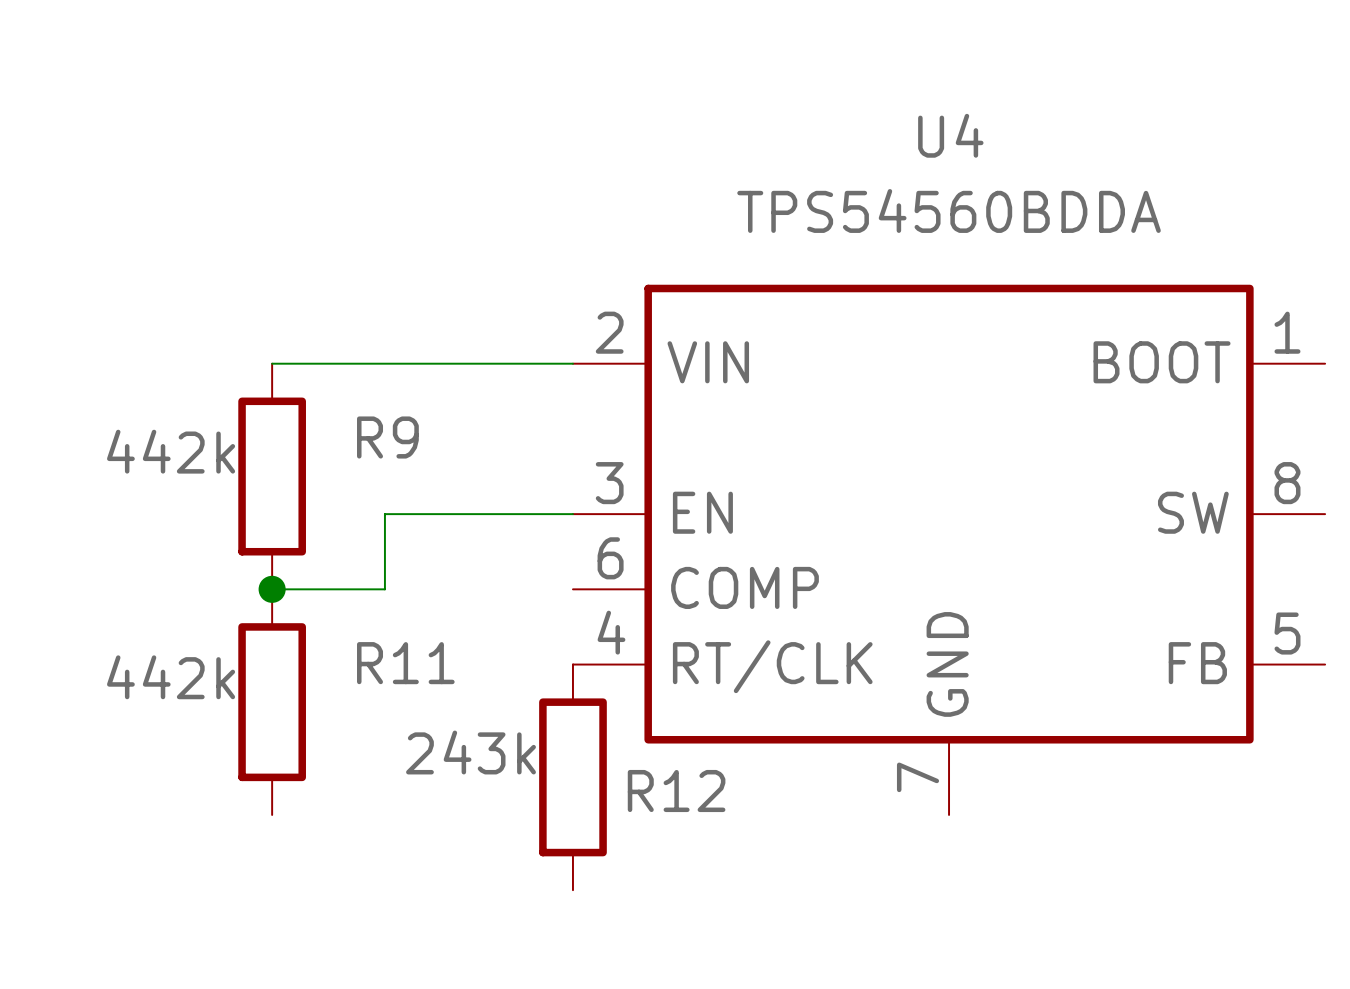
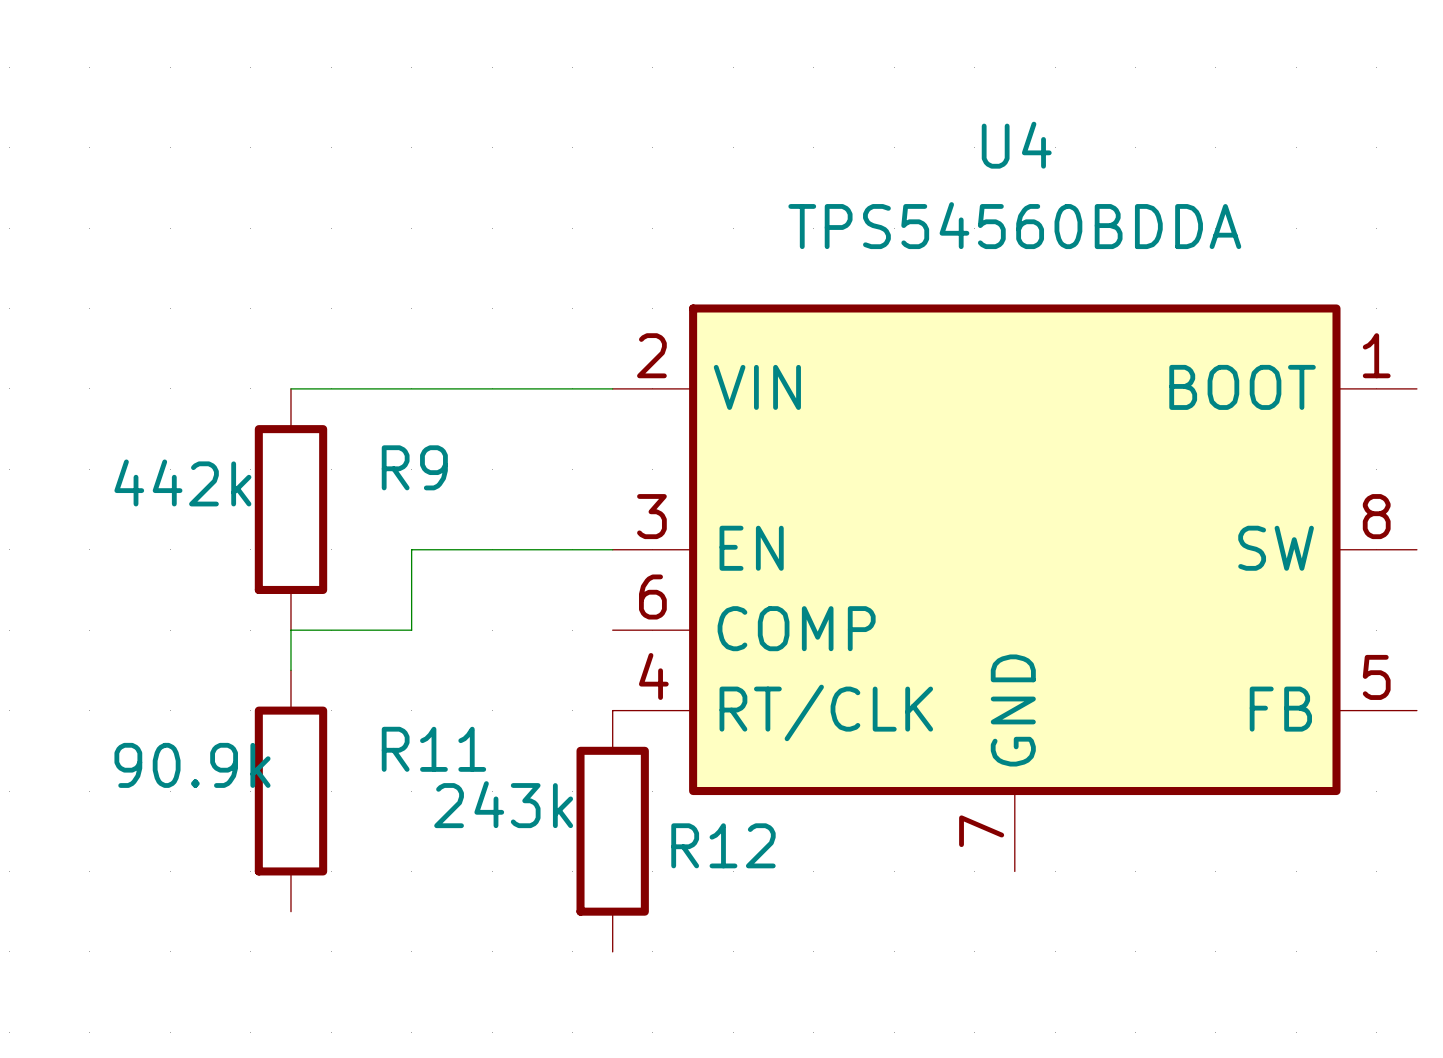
junction: (272, 589) -> none
R11 value: 442k (171, 677) -> 90.9k (192, 765)
R11 position: (272, 702) -> (290, 791)

